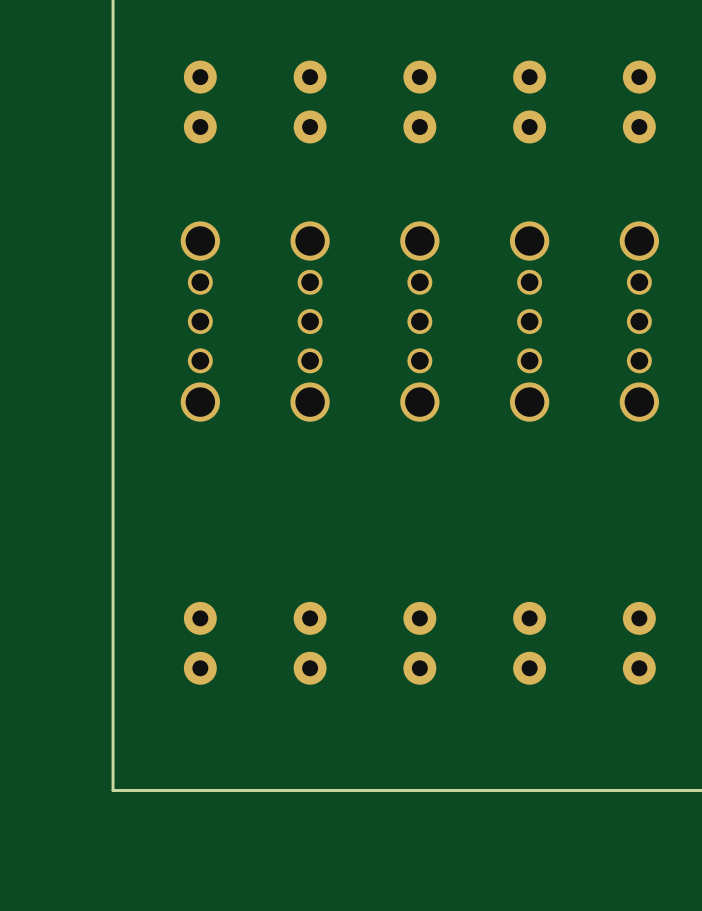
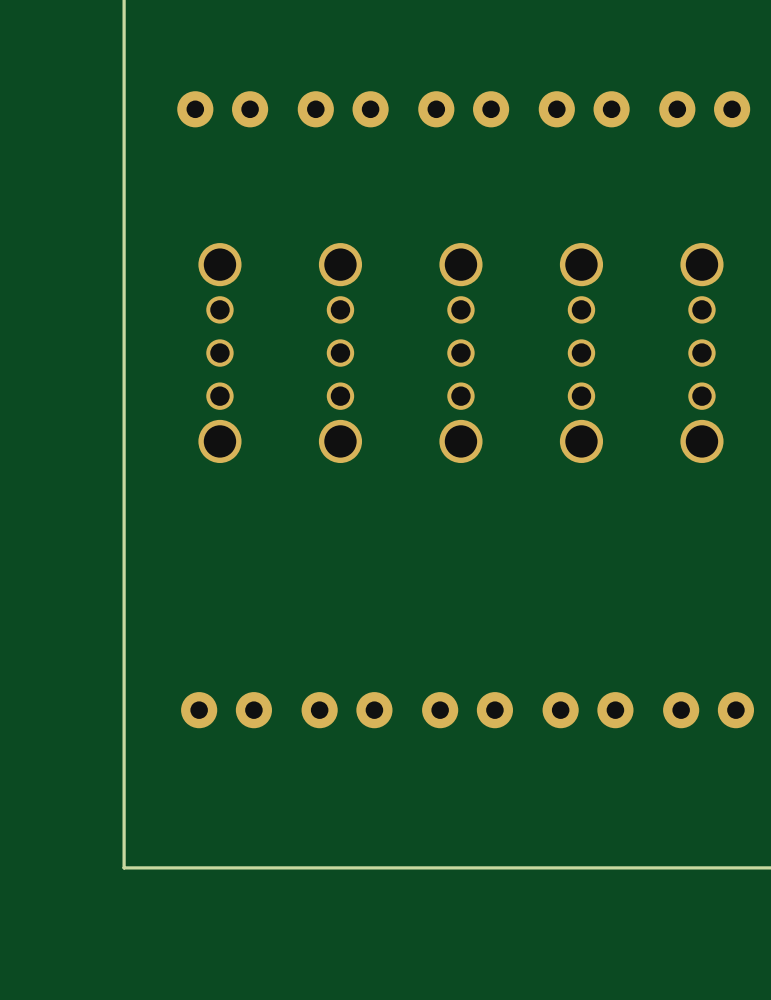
part rotation: 0° (200, 102) -> 90° clockwise (222, 109)
part rotation: 0° (310, 102) -> 90° clockwise (343, 109)
part rotation: 0° (419, 102) -> 90° clockwise (463, 109)
part rotation: 0° (529, 102) -> 90° clockwise (584, 109)
part rotation: 0° (639, 102) -> 90° clockwise (704, 109)
part rotation: 0° (200, 643) -> 90° clockwise (226, 710)
part rotation: 0° (310, 643) -> 90° clockwise (347, 710)
part rotation: 0° (419, 643) -> 90° clockwise (467, 710)
part rotation: 0° (529, 643) -> 90° clockwise (588, 710)
part rotation: 0° (639, 643) -> 90° clockwise (708, 710)

